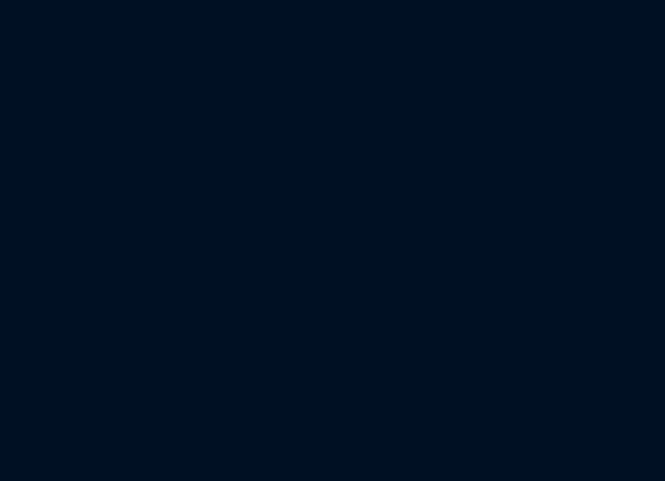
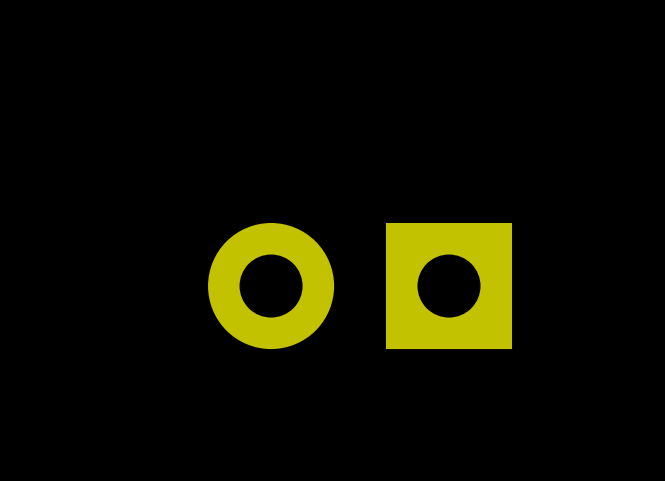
part: none -> (360, 286)

